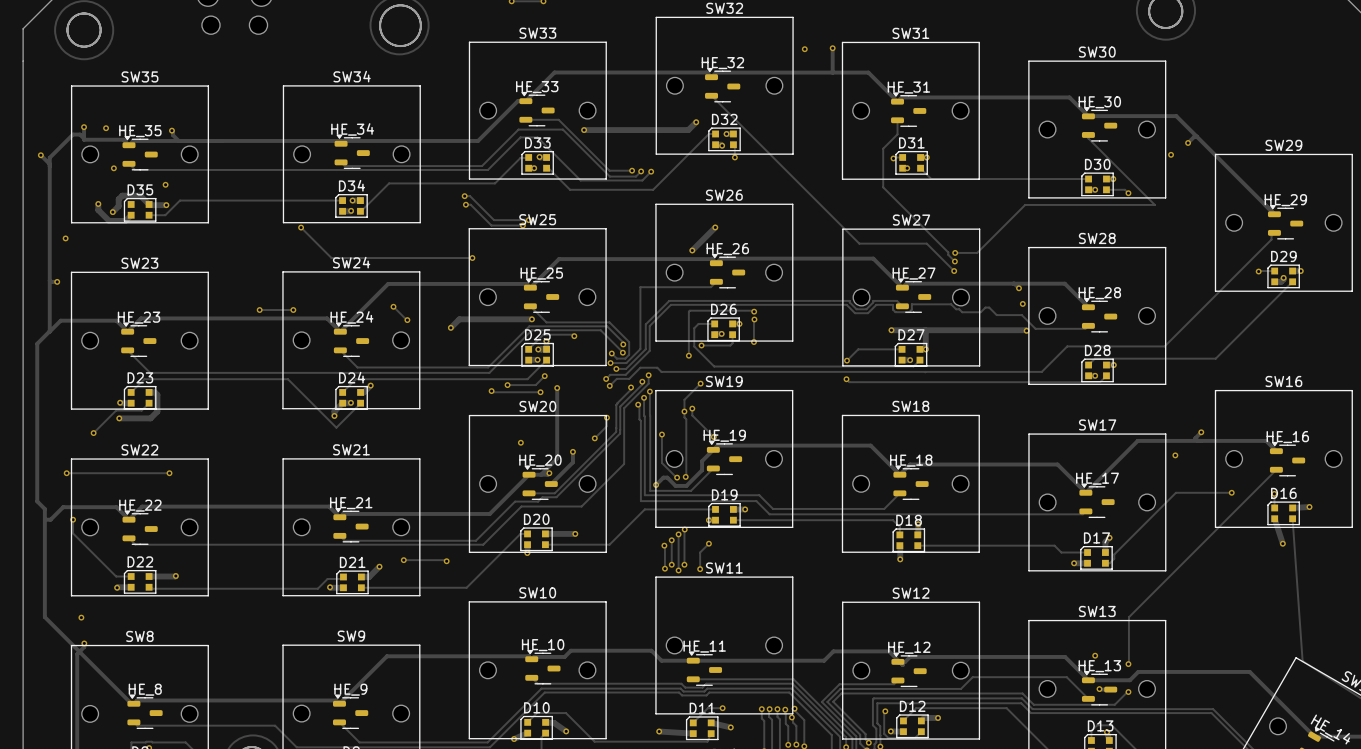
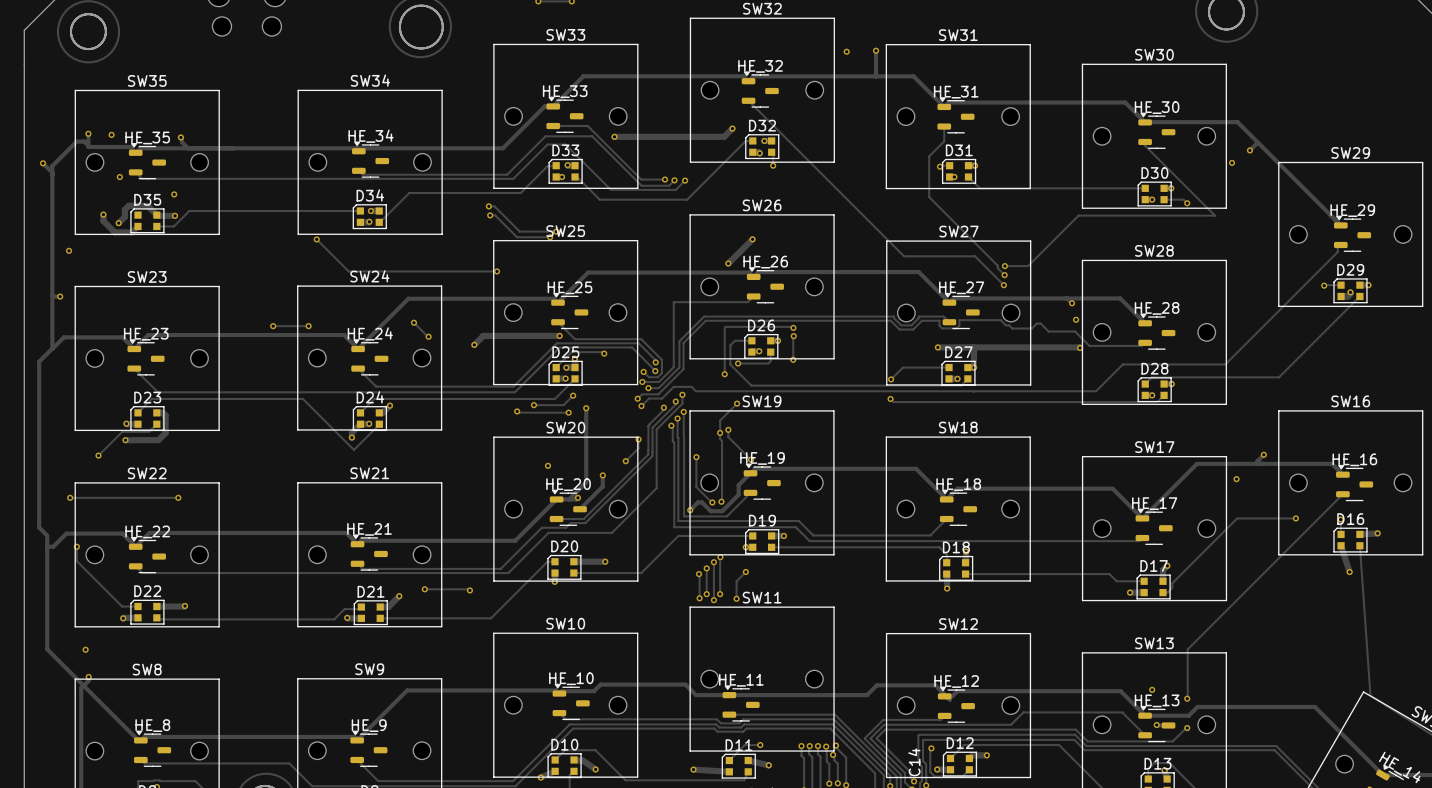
C14: none -> (914, 762)

